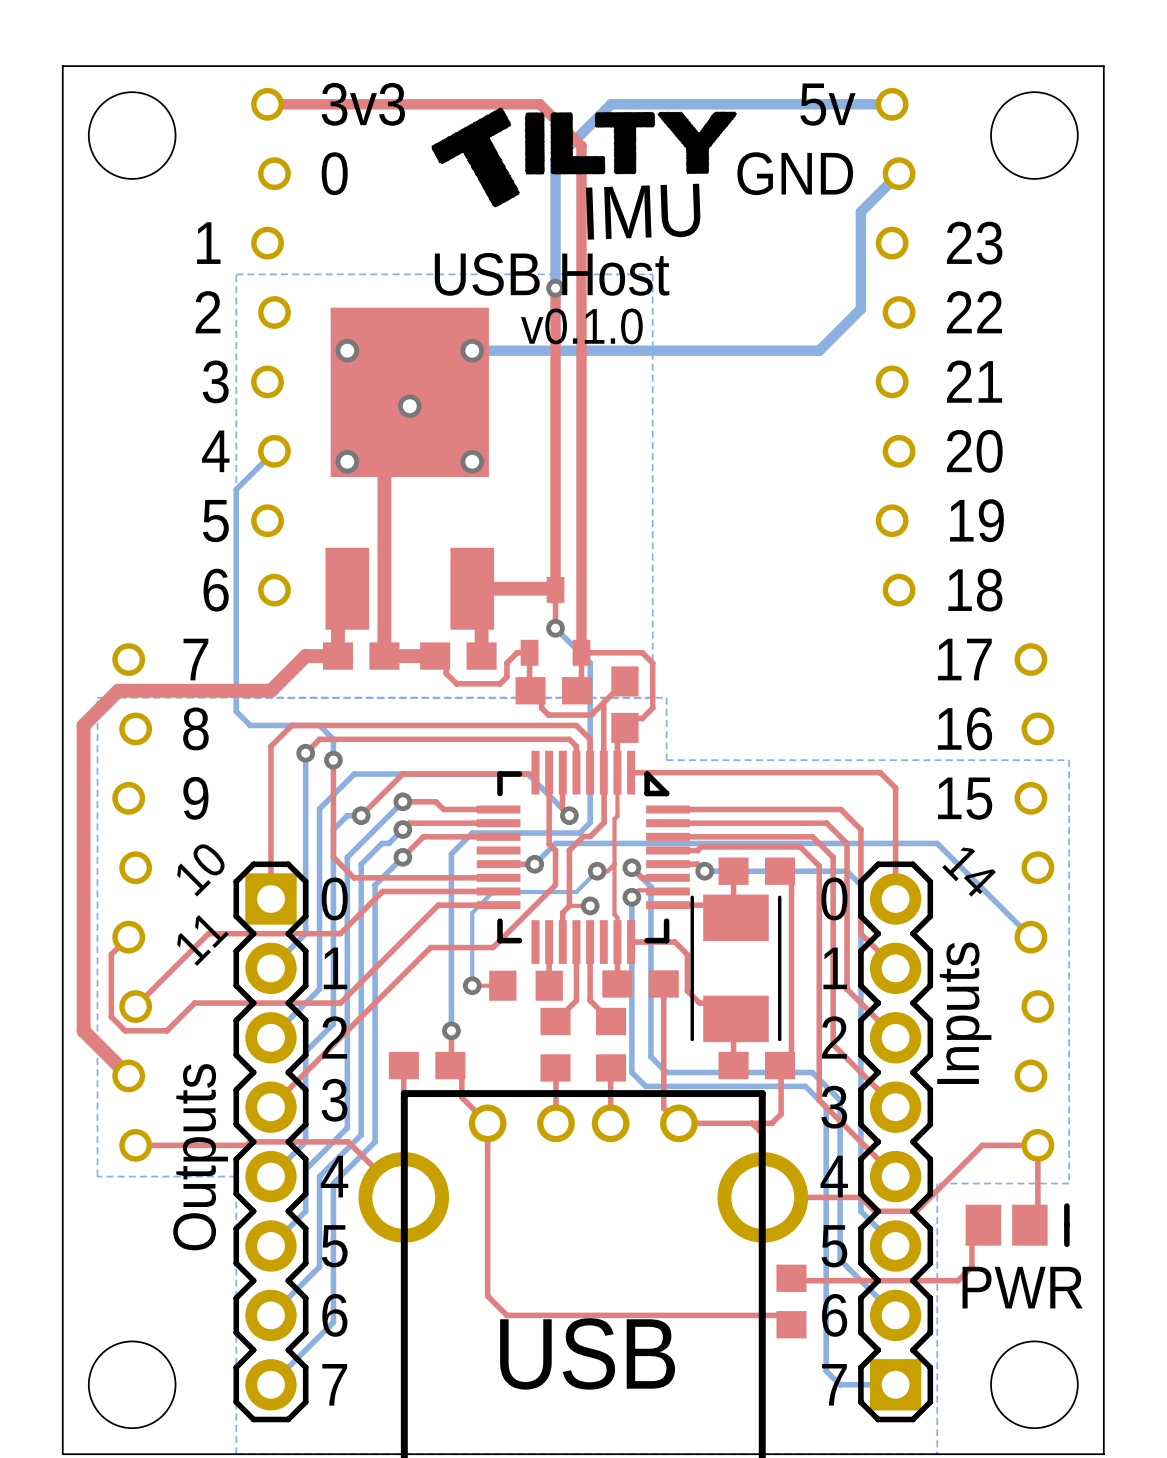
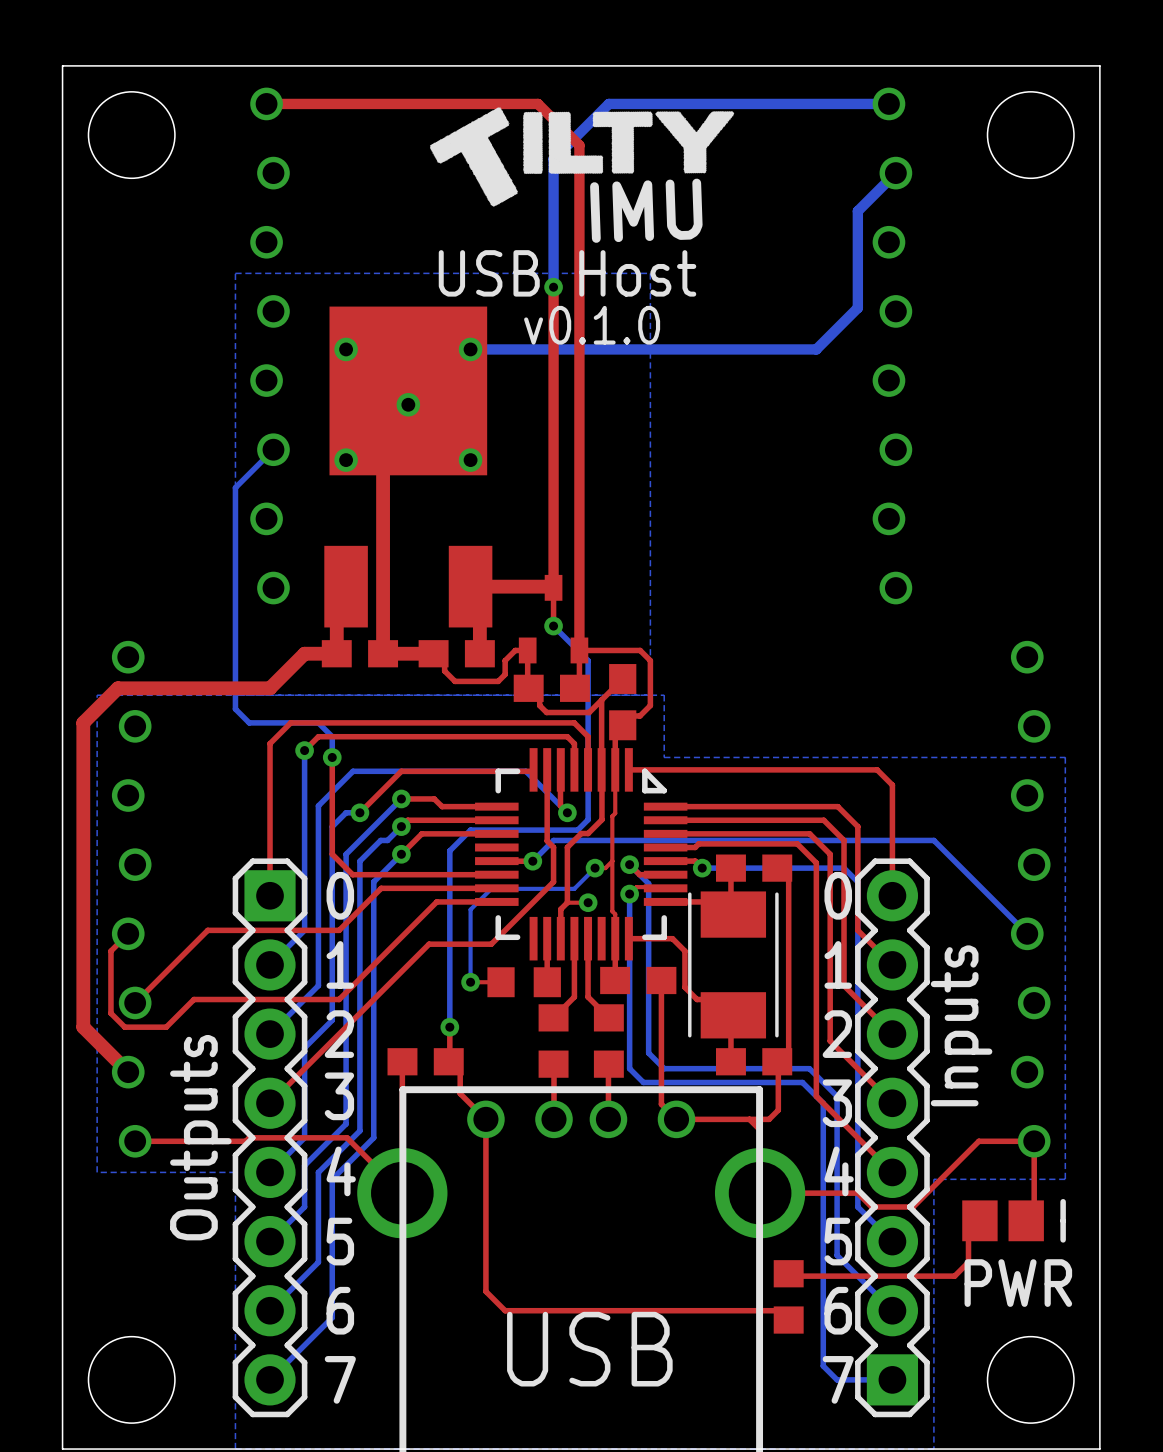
text: 3v3 (363, 104) -> none
text: 5v (827, 104) -> none
text: 0 (334, 173) -> none
text: GND (795, 173) -> none
text: 1 (208, 243) -> none
text: 23 (974, 243) -> none
text: 2 (208, 312) -> none
text: 22 (974, 312) -> none
text: 3 (215, 381) -> none
text: 21 (974, 381) -> none
text: 4 (215, 451) -> none
text: 20 (974, 451) -> none
text: 19 (977, 520) -> none
text: 5 (215, 521) -> none
text: 6 (216, 590) -> none
text: 18 (975, 590) -> none
text: 7 (195, 659) -> none
text: 17 (964, 659) -> none
text: 8 (195, 728) -> none
text: 16 (965, 728) -> none
text: 9 (195, 798) -> none
text: 15 (965, 798) -> none
text: 10 (201, 869) -> none
text: 14 (969, 872) -> none
text: 11 (202, 940) -> none

